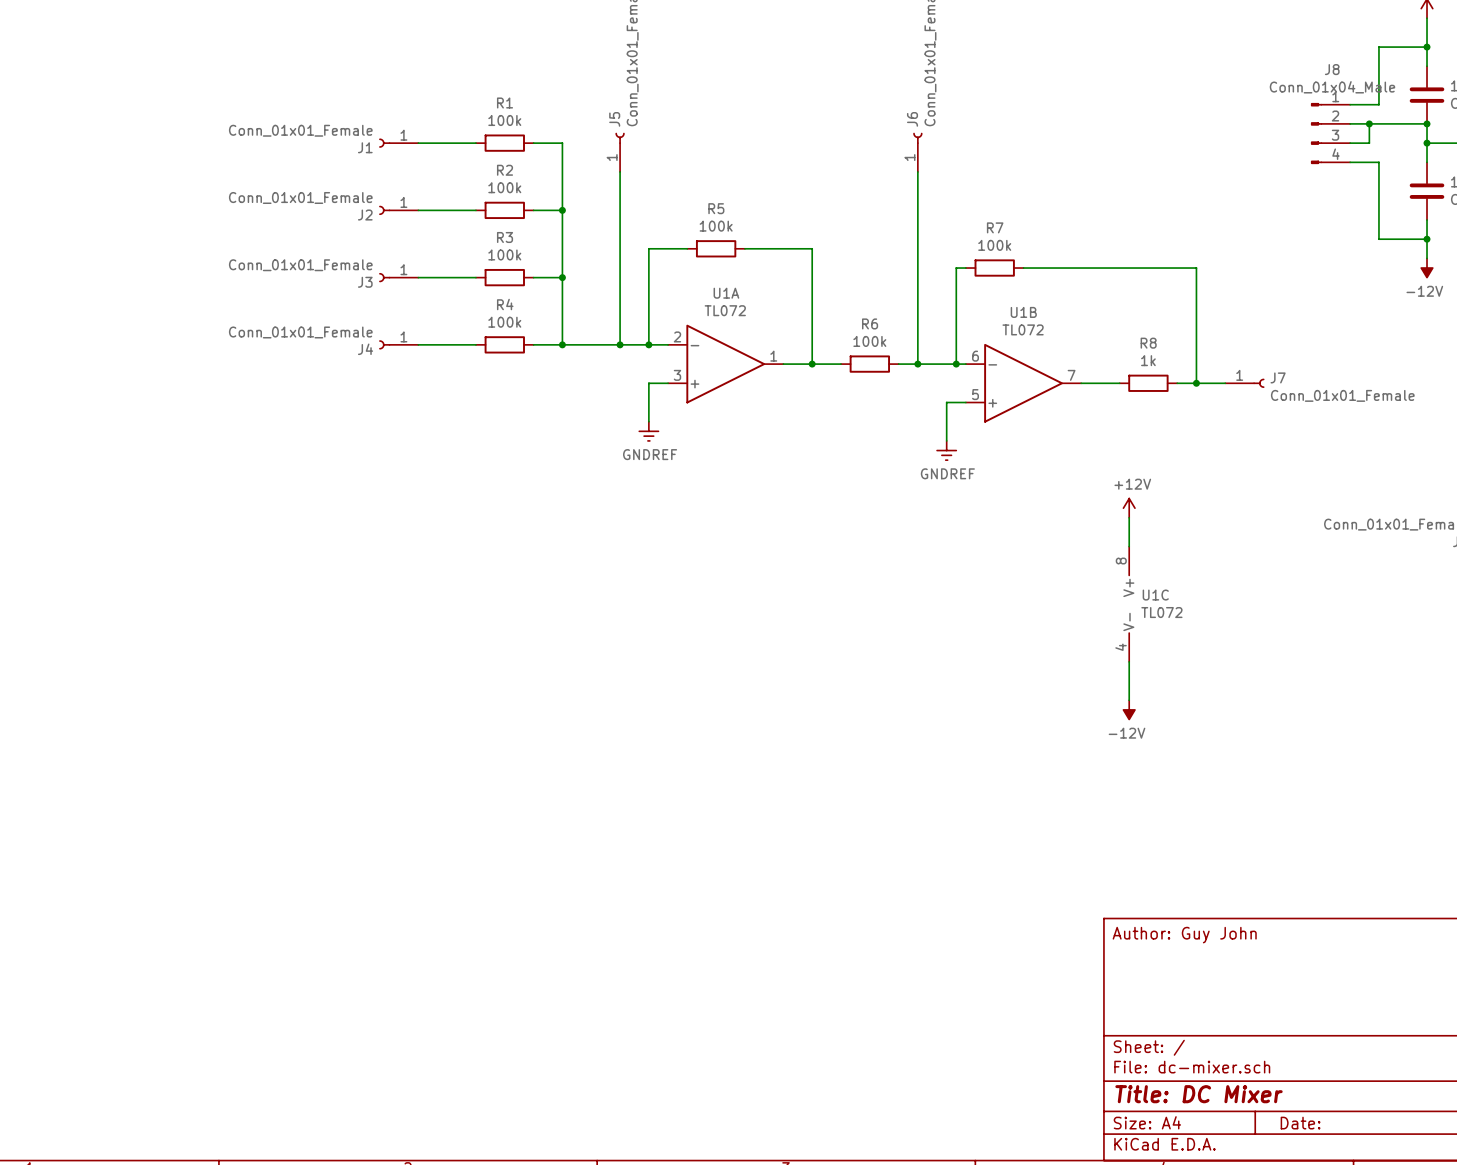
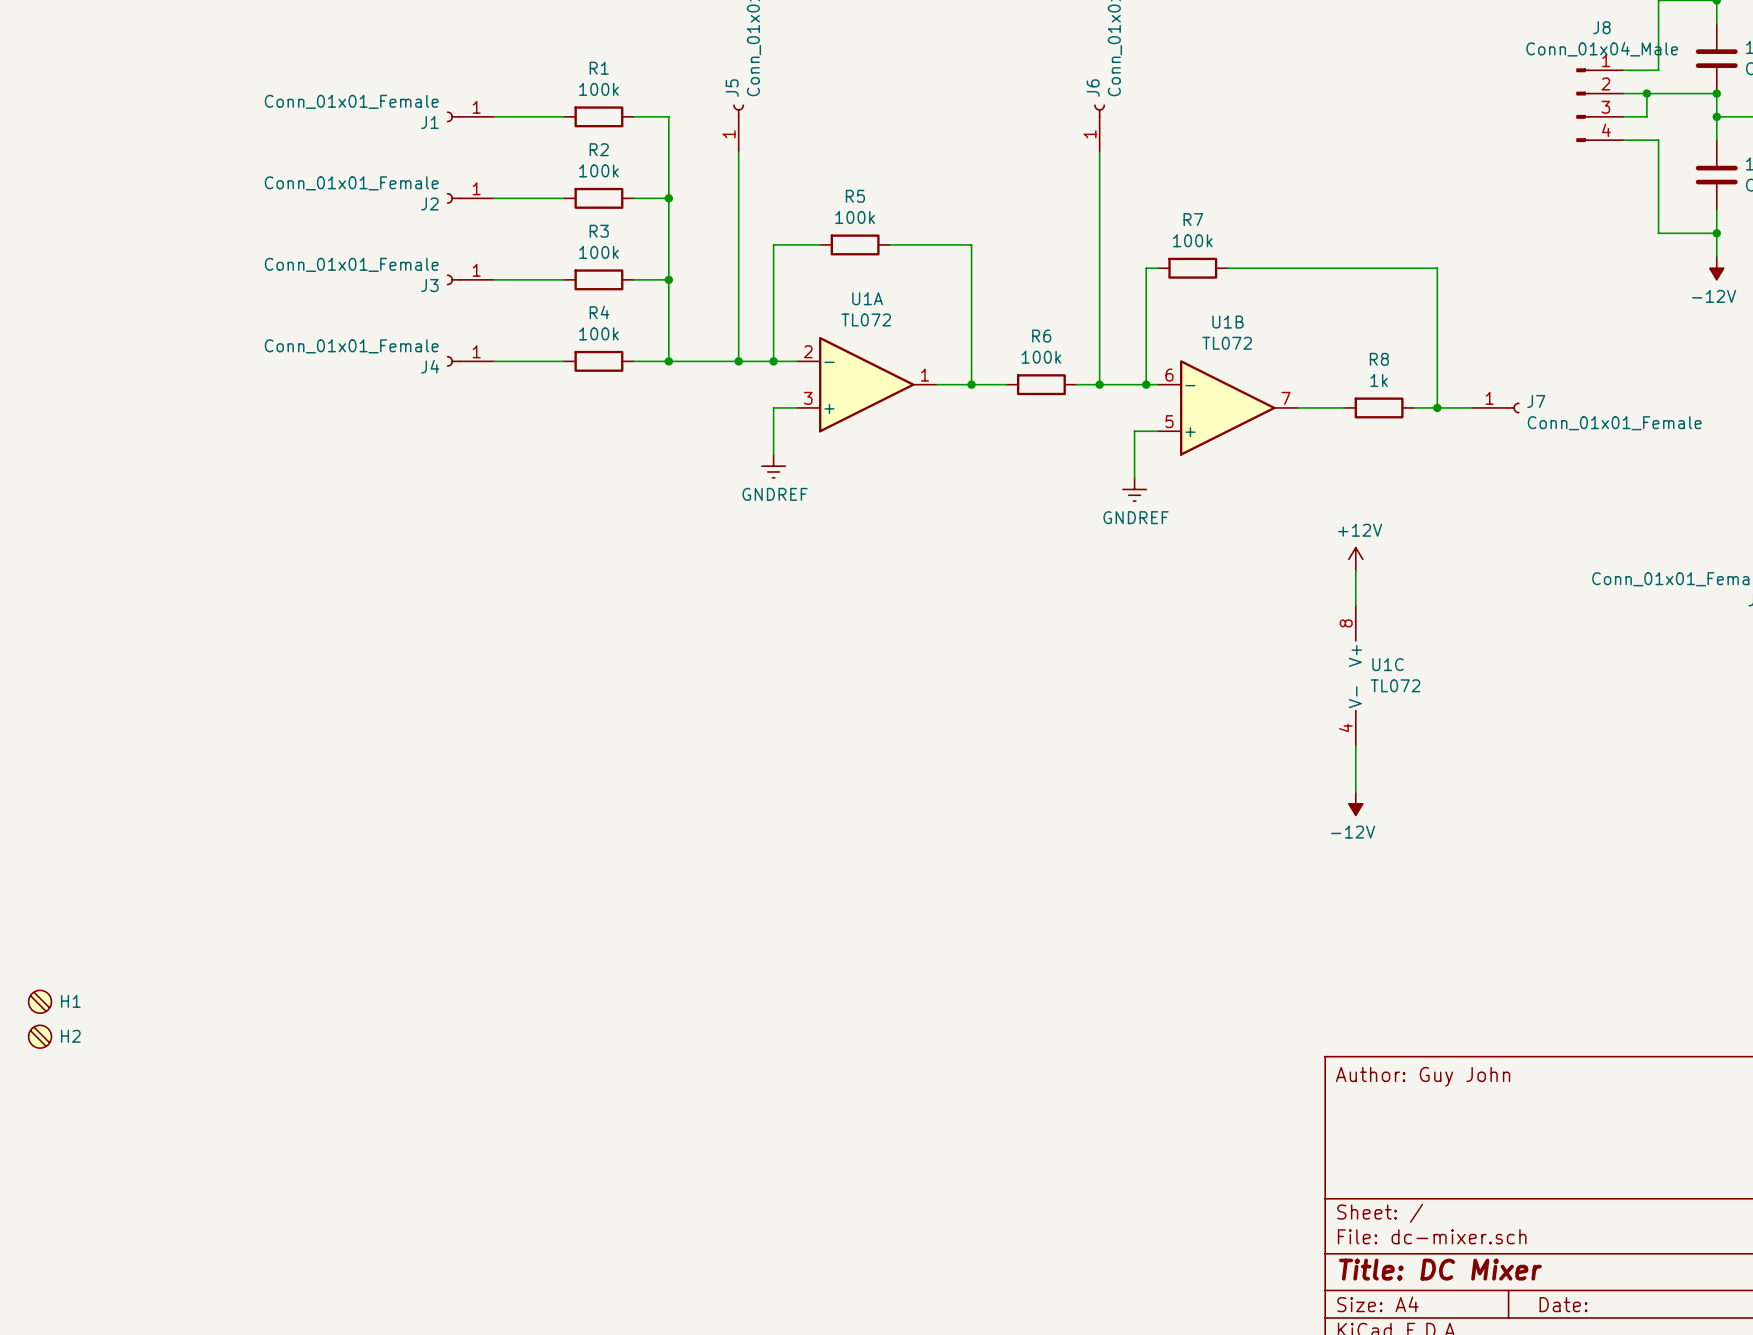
H1: none -> (40, 1001)
H2: none -> (40, 1036)

